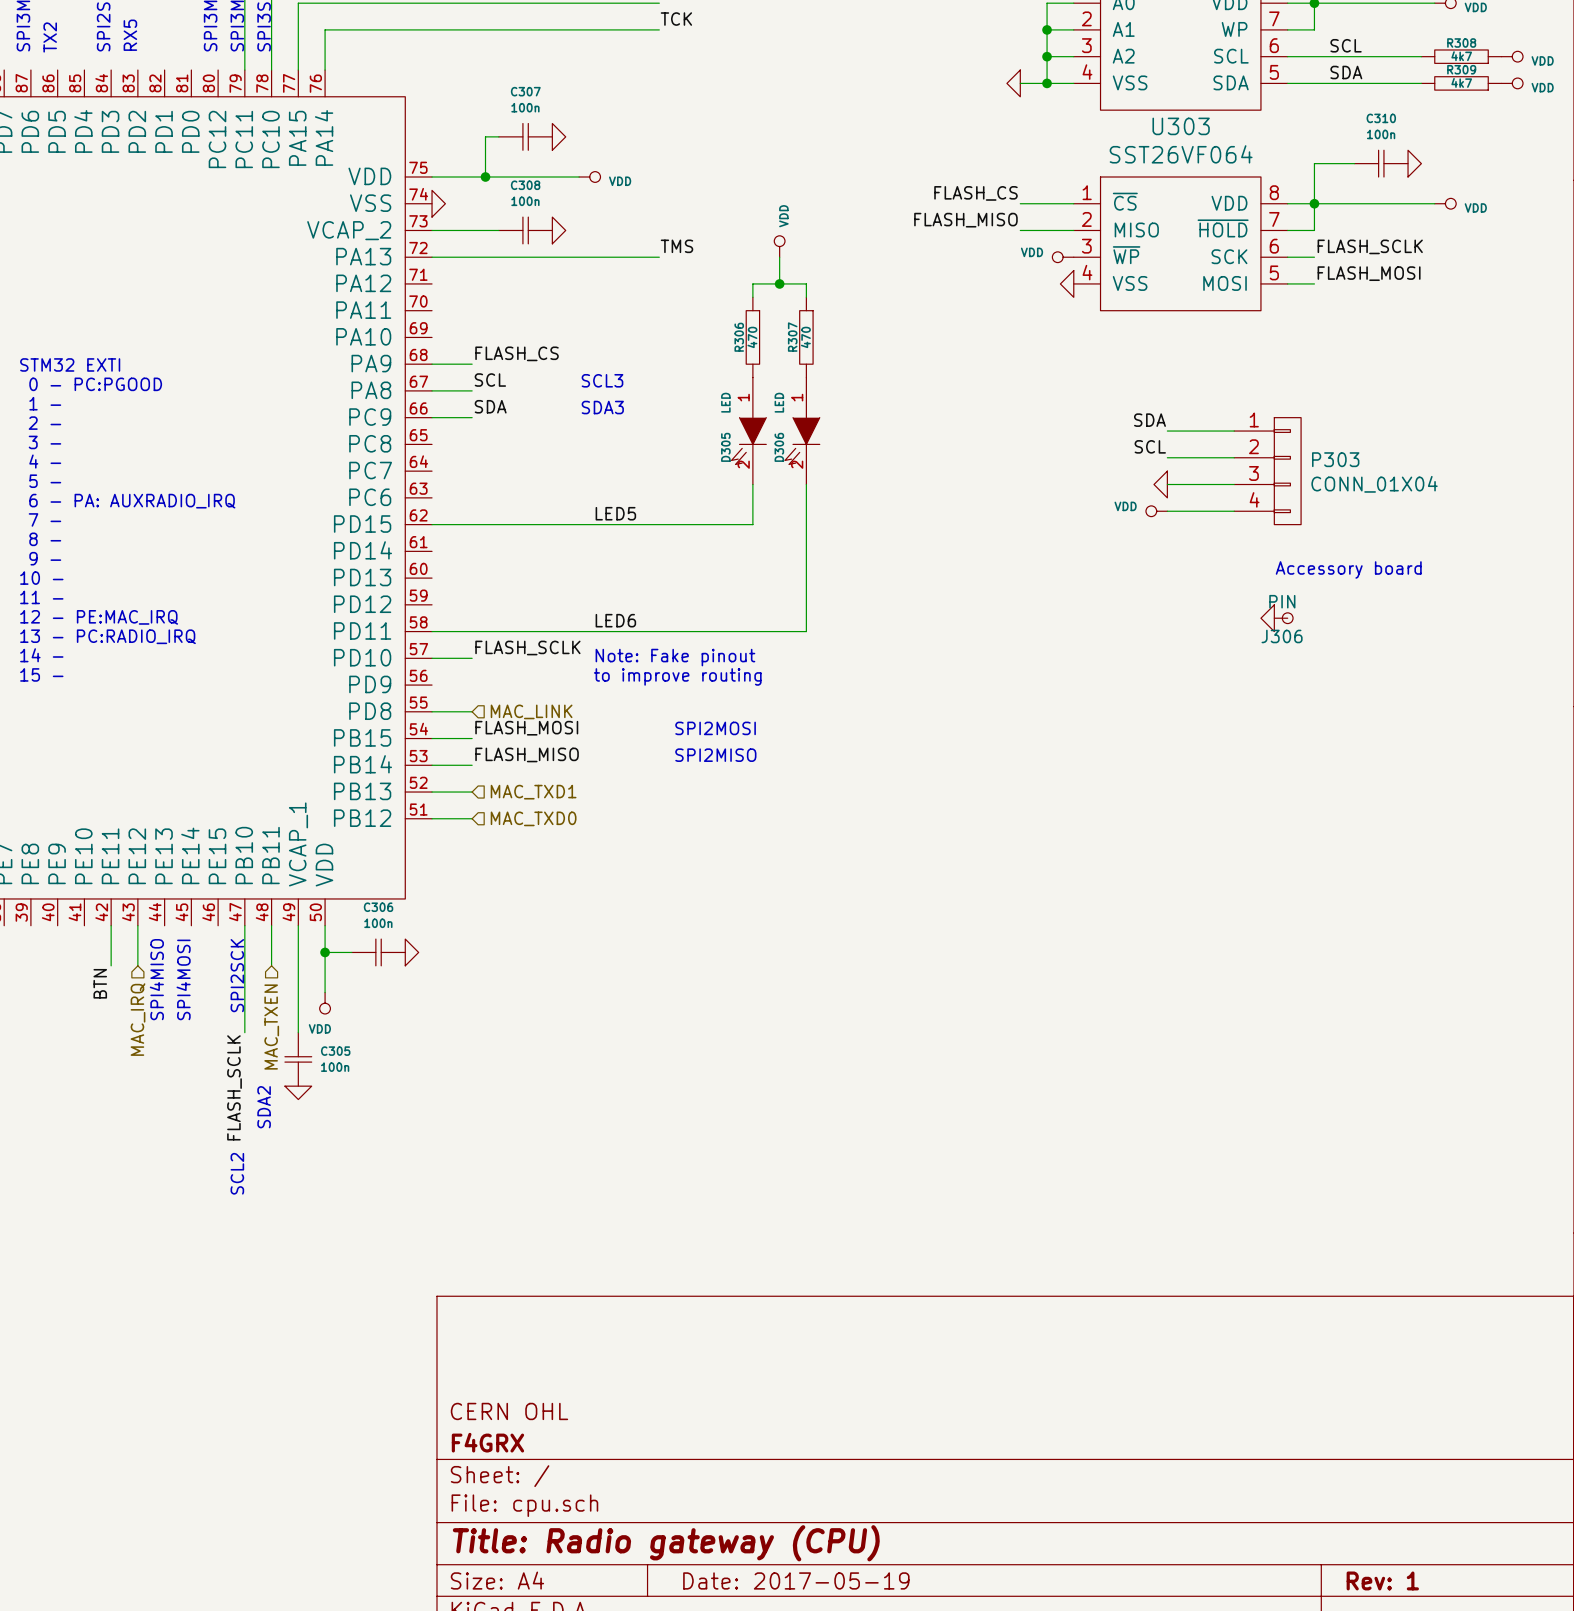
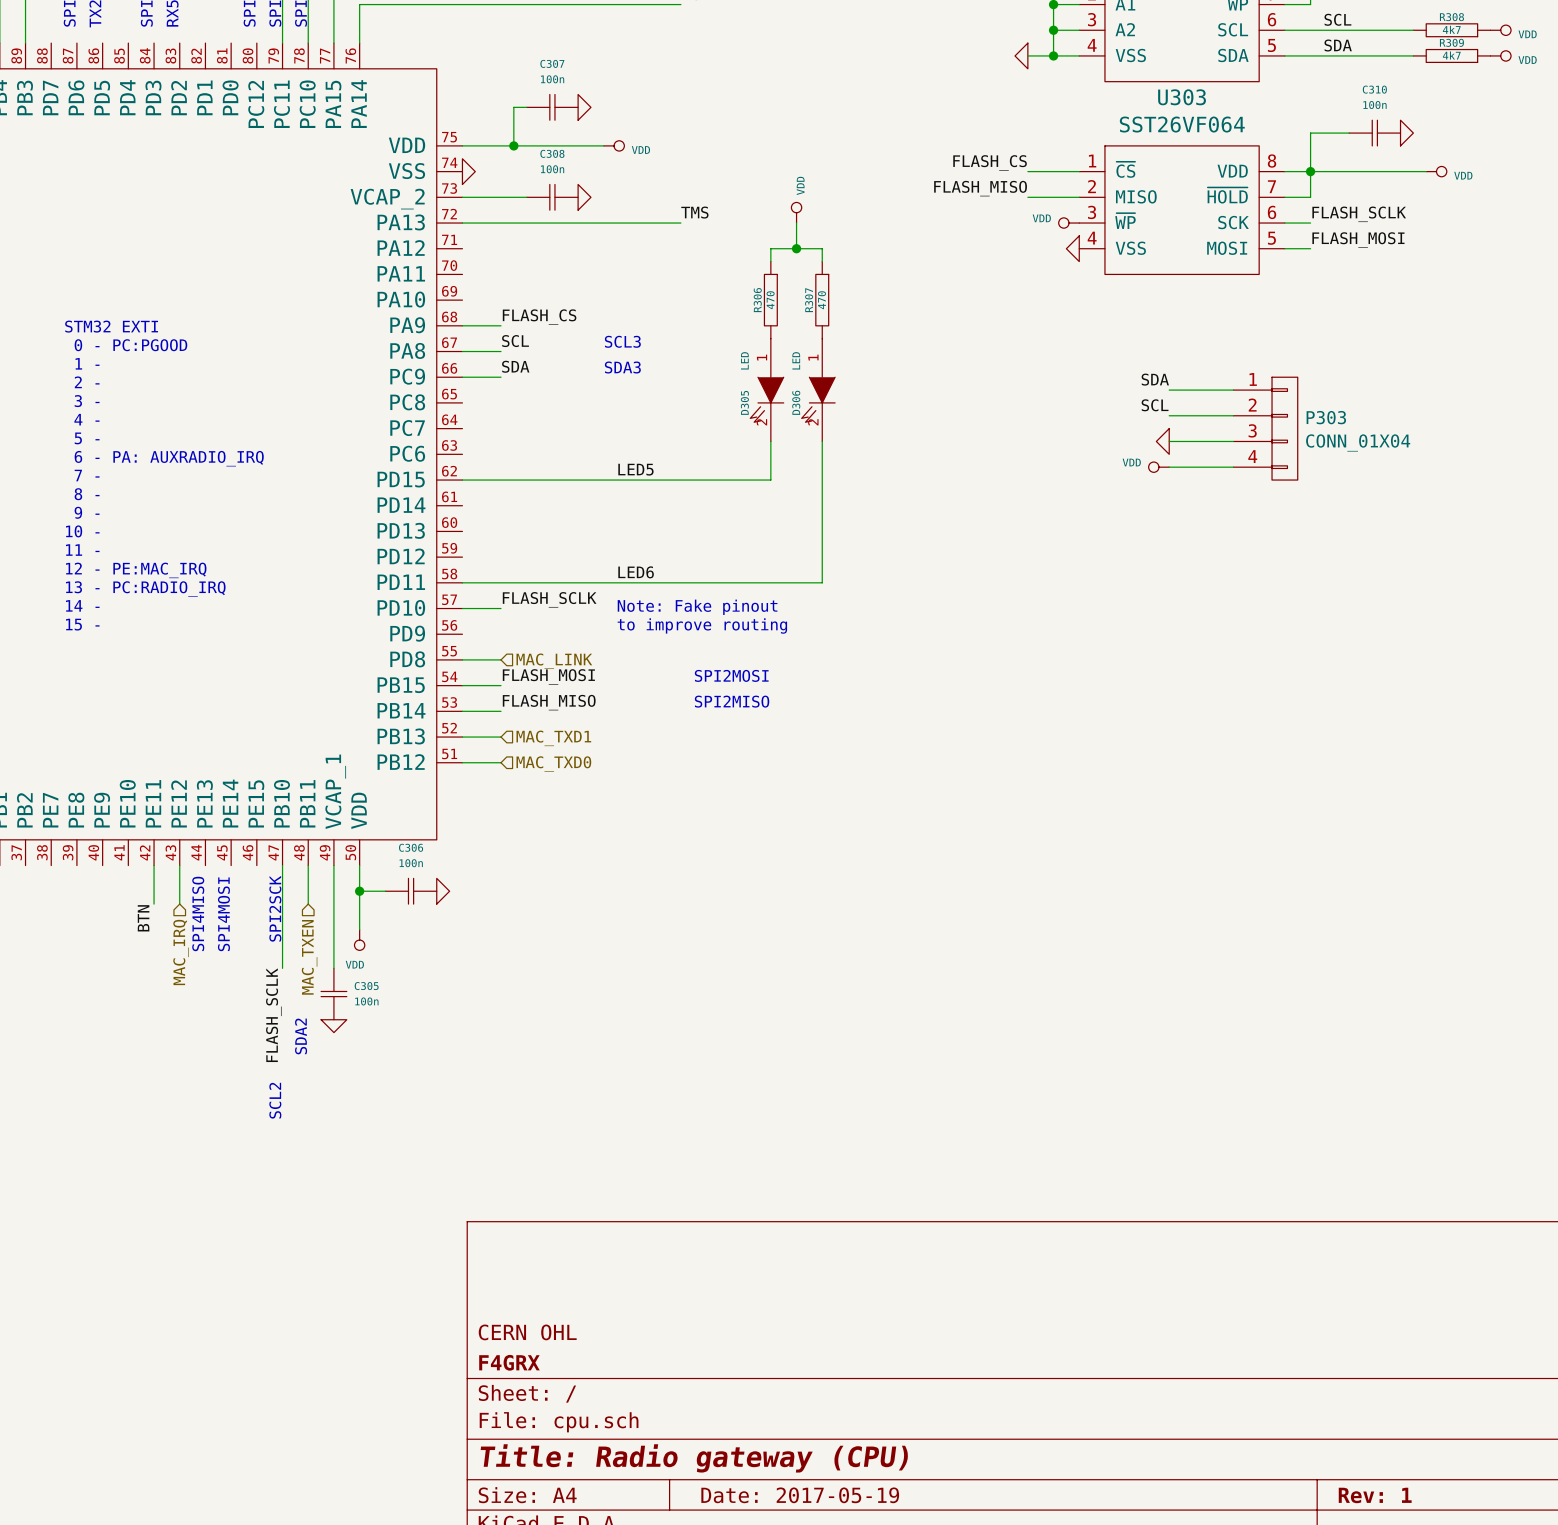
text: Accessory board (1348, 569) -> none
power symbol: (1267, 618) -> none
J306: PIN (1283, 618) -> none

